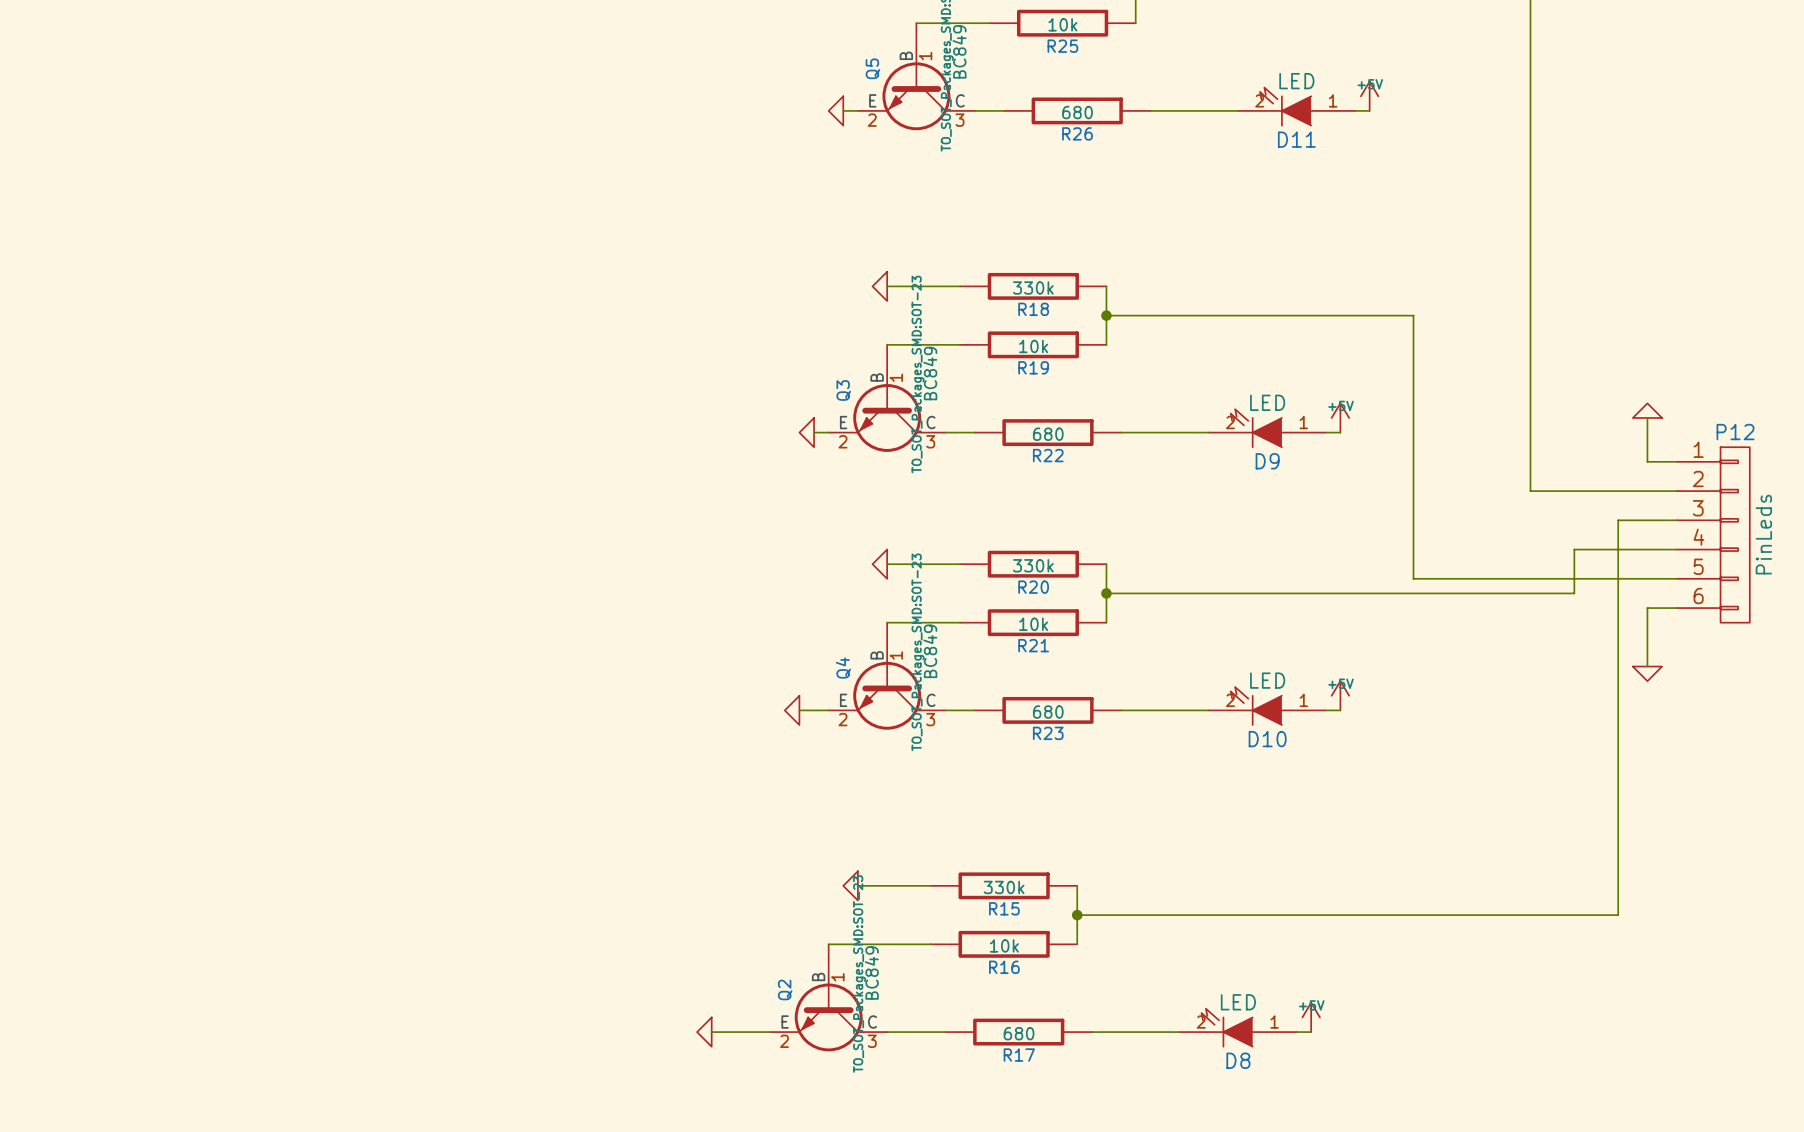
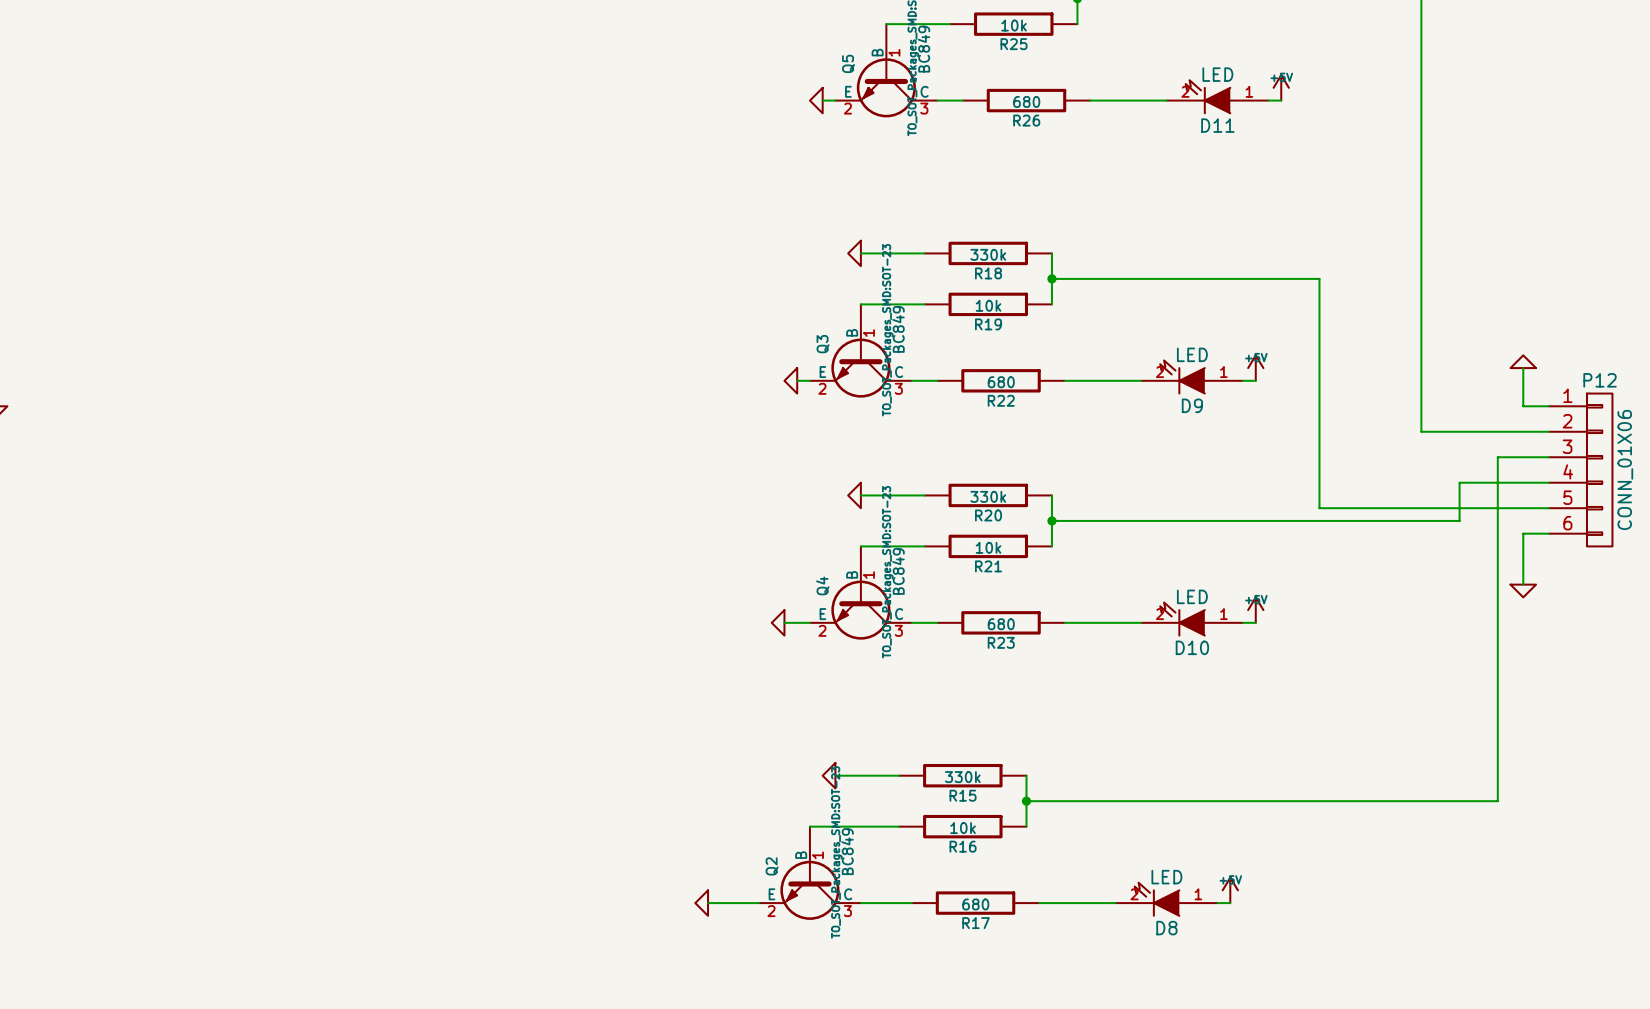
P12 value: PinLeds (1763, 534) -> CONN_01X06 (1625, 469)

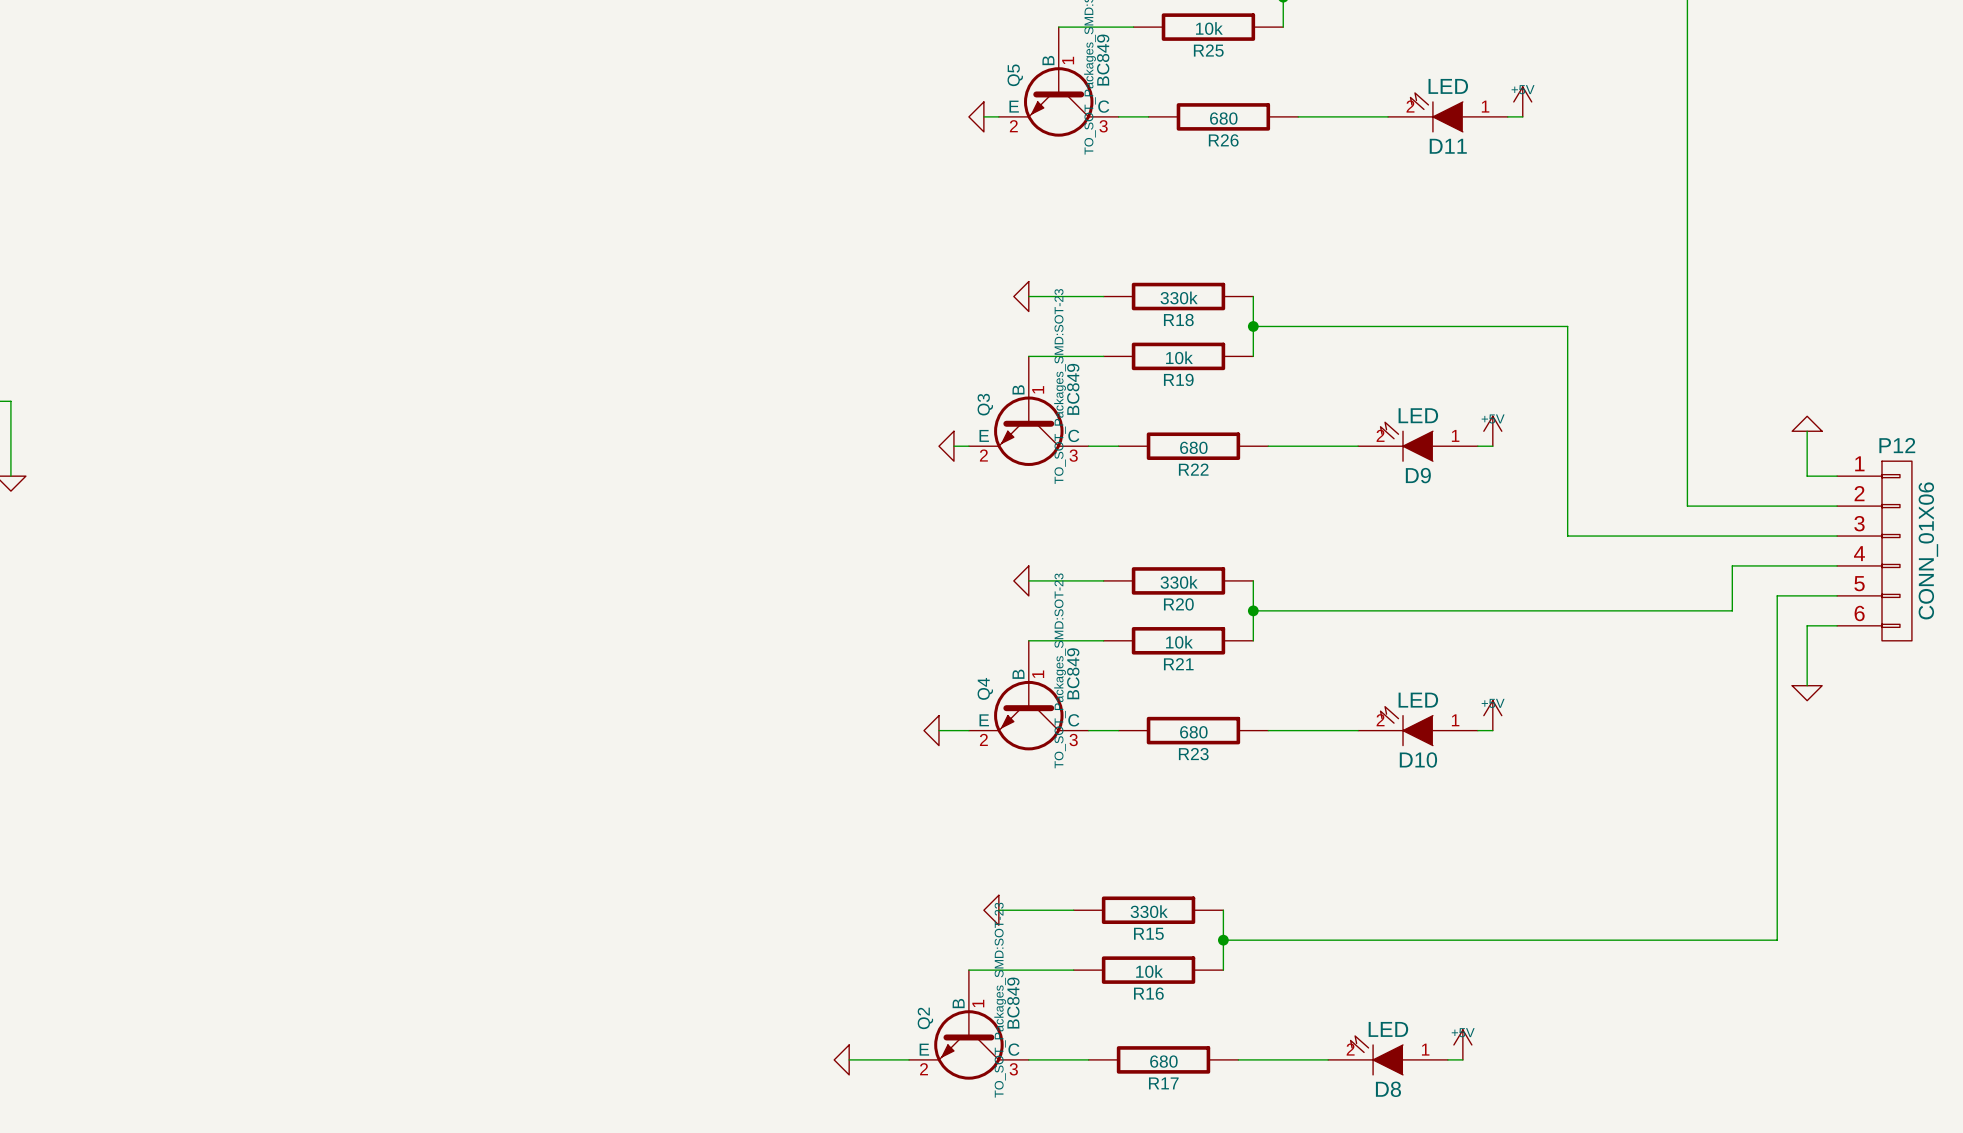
wire: (1319, 457) (1319, 508) (1497, 508) (1497, 457) -> (1567, 536) (1777, 536)

